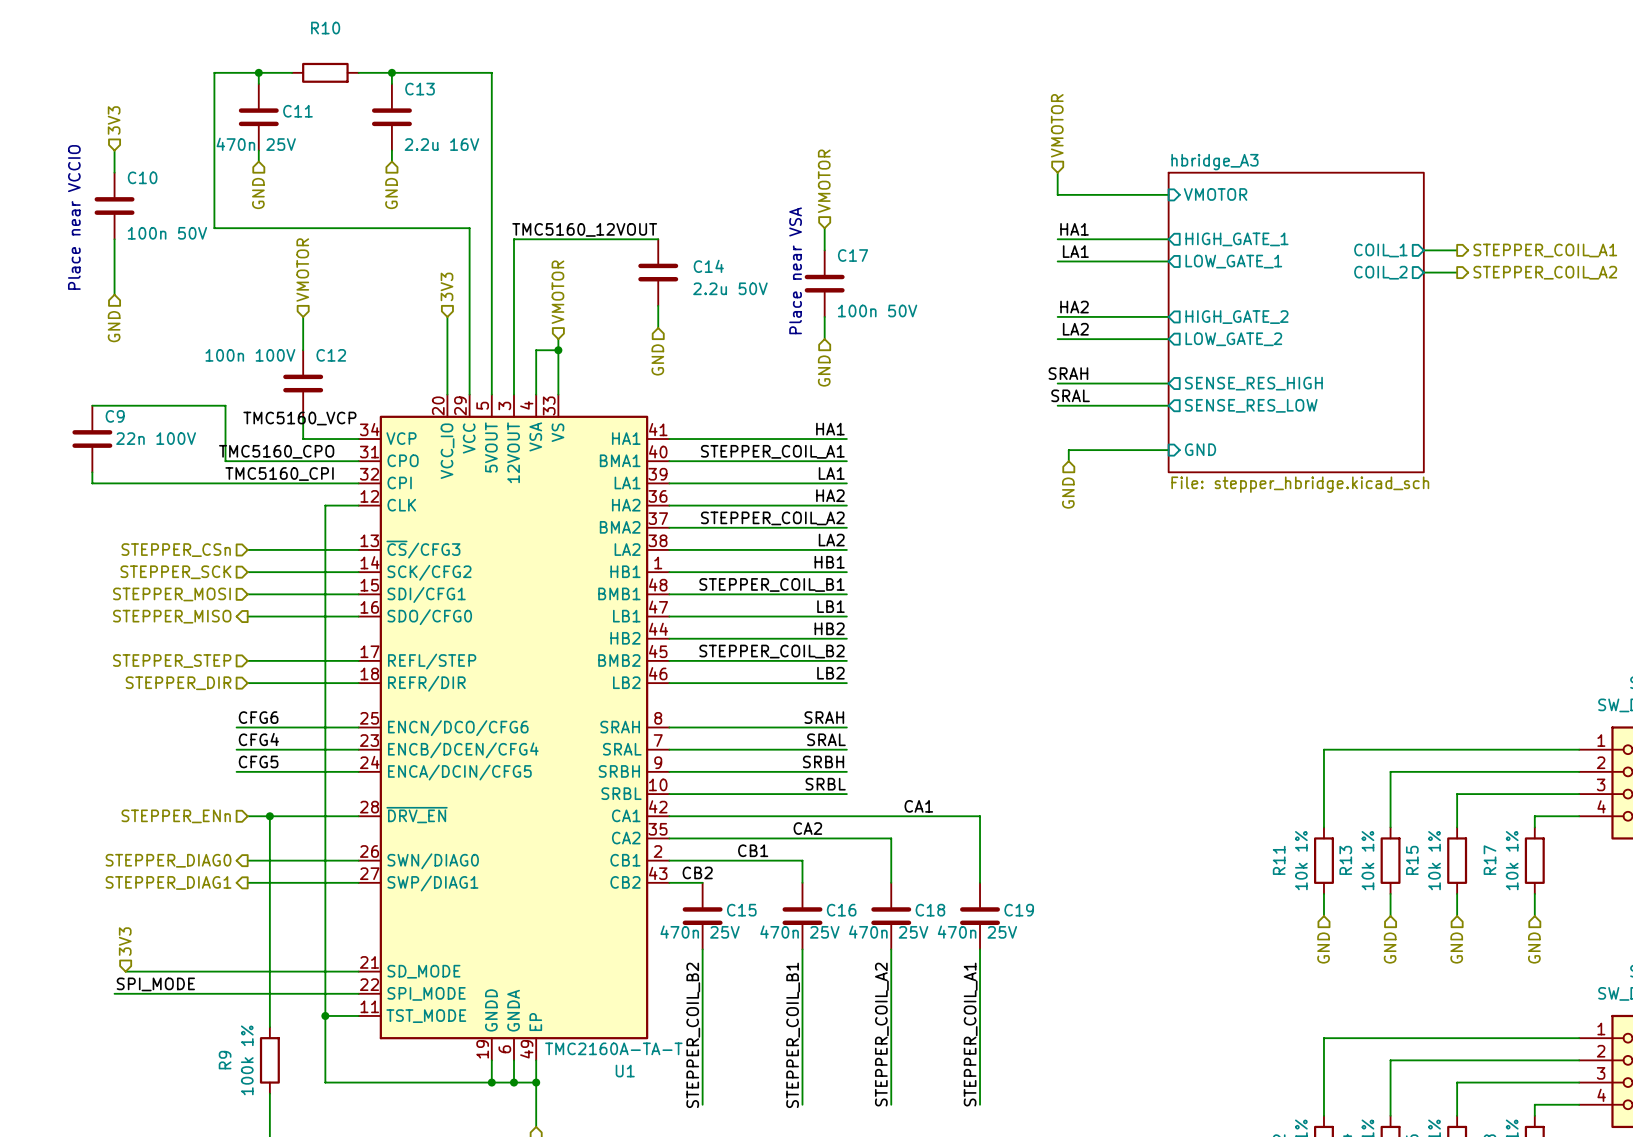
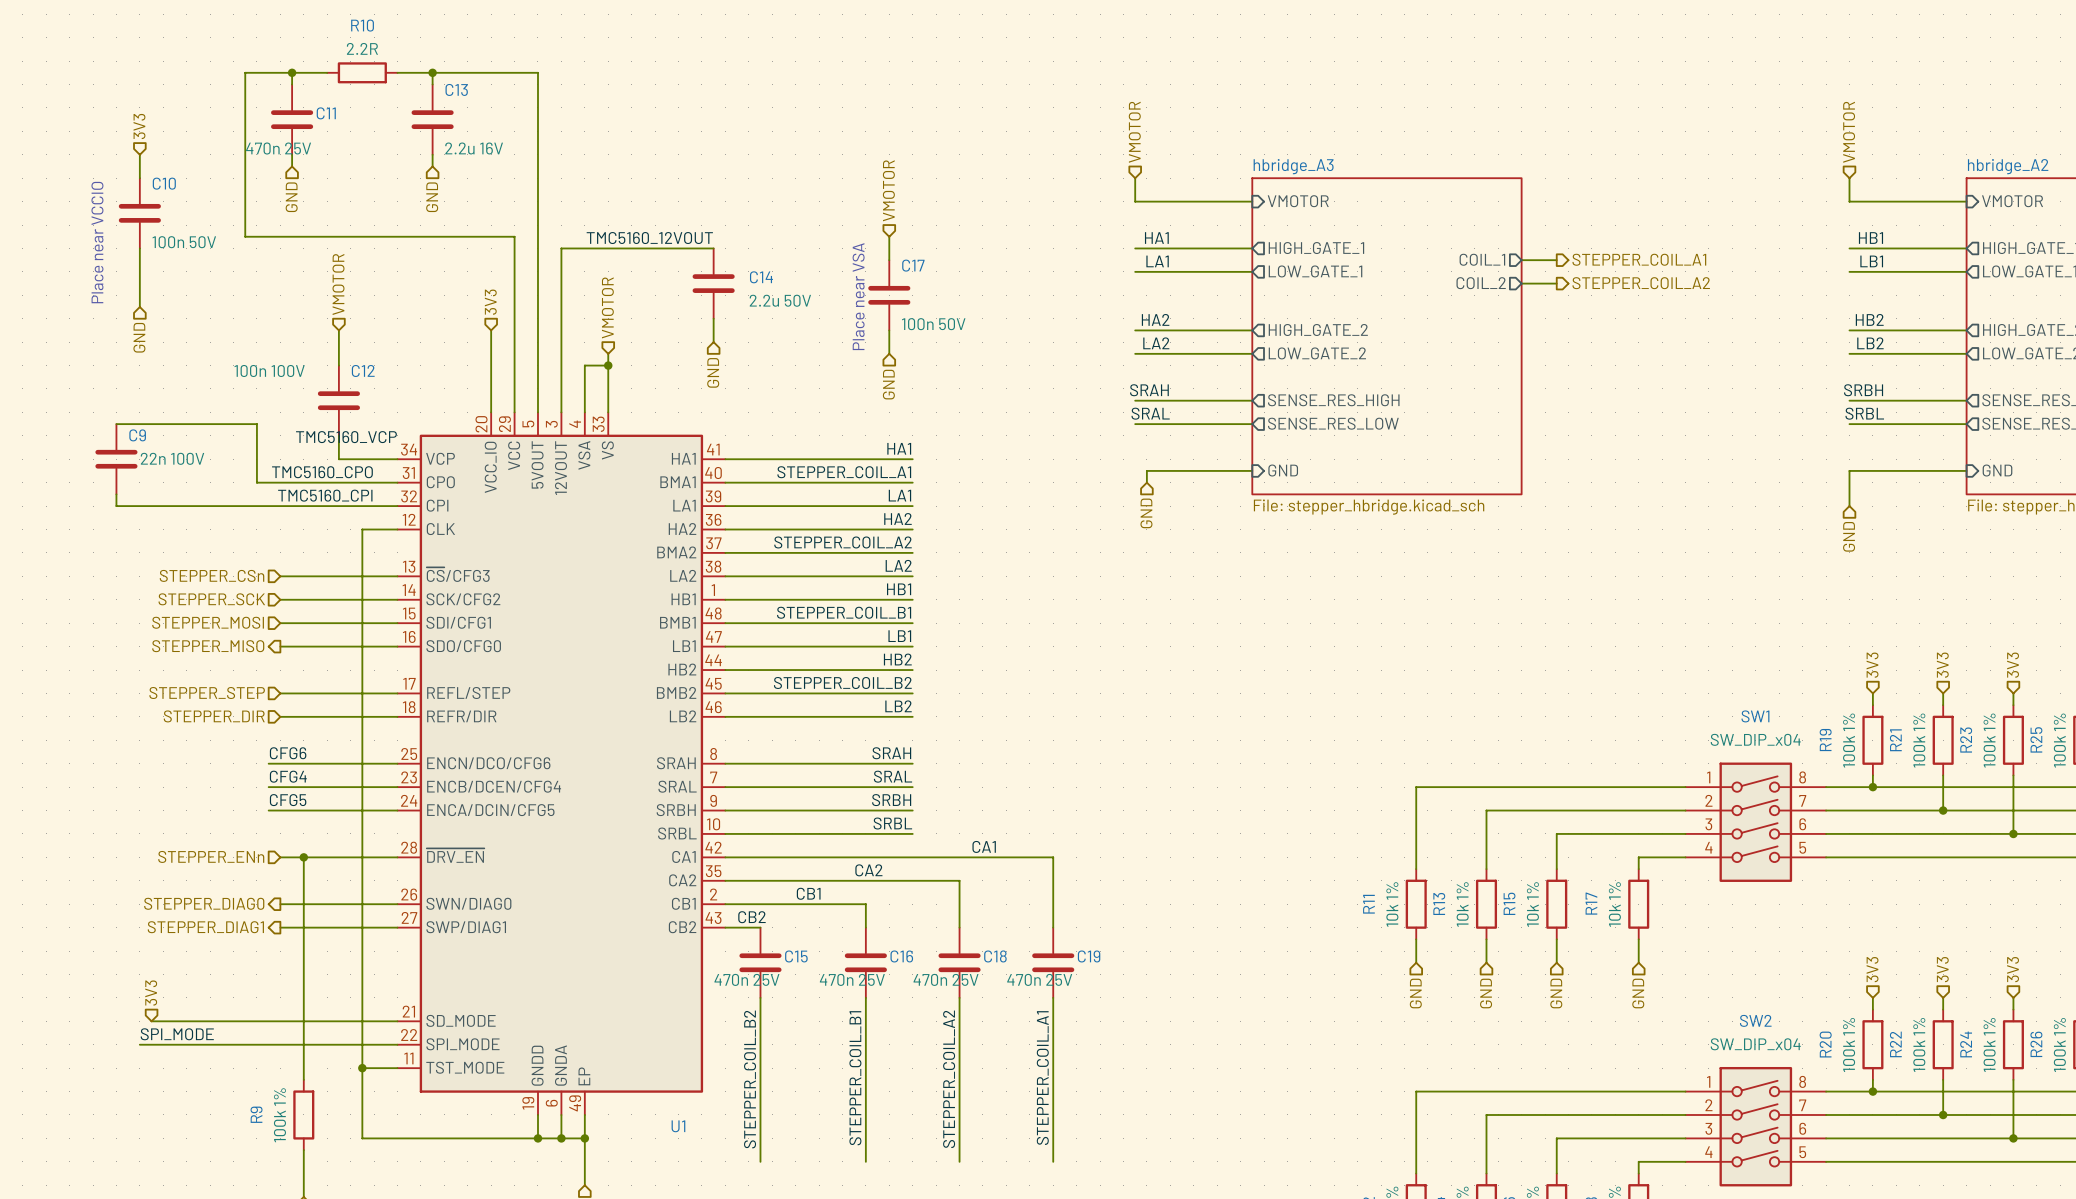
R10 value: none -> 2.2R (362, 48)
U1 value: TMC2160A-TA-T (613, 1048) -> none

